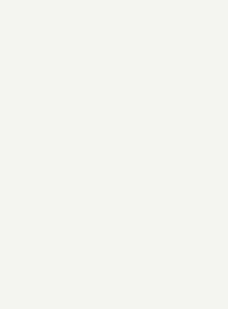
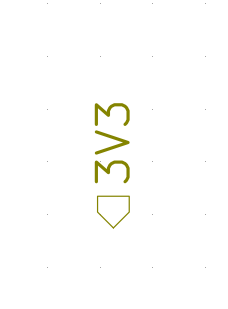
hierarchical label: none -> 3V3 (112, 143)

